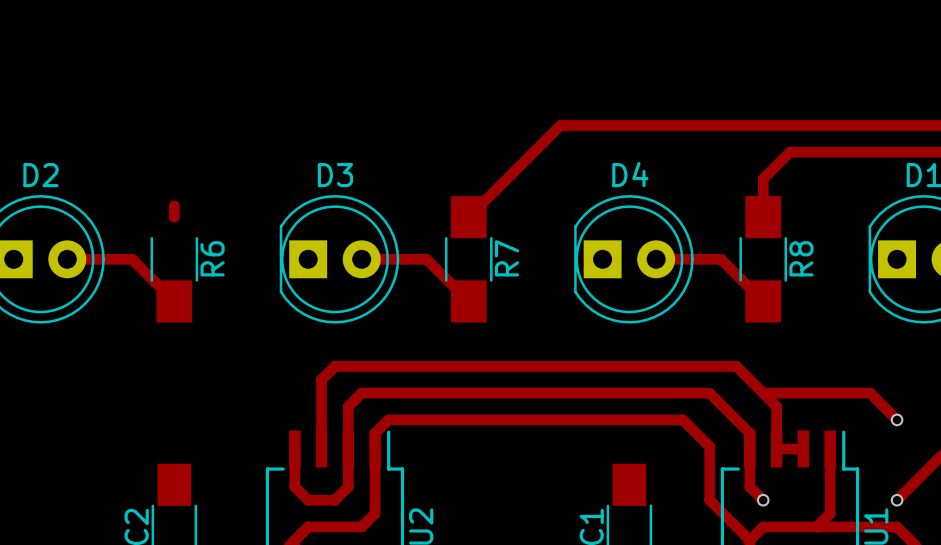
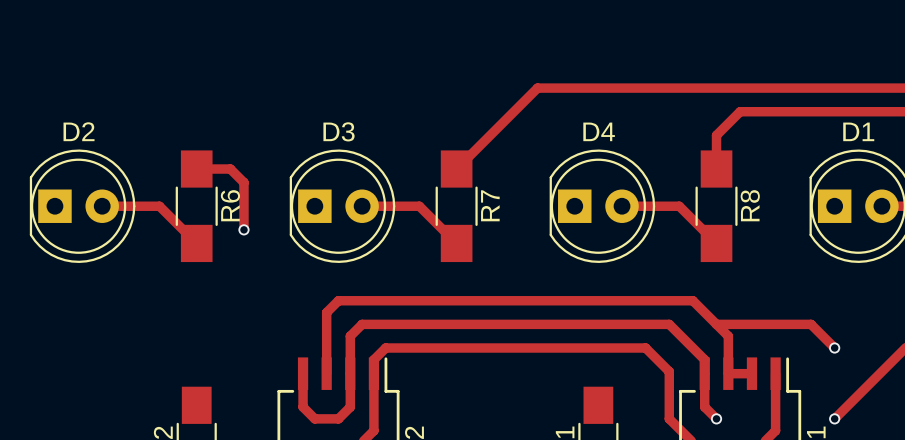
track: (174, 205) (174, 217) -> (243, 229) (243, 182) (230, 169) (196, 169)
R6 footprint: [150, 236, 199, 323] -> [175, 150, 218, 263]
via: none -> (243, 229)

